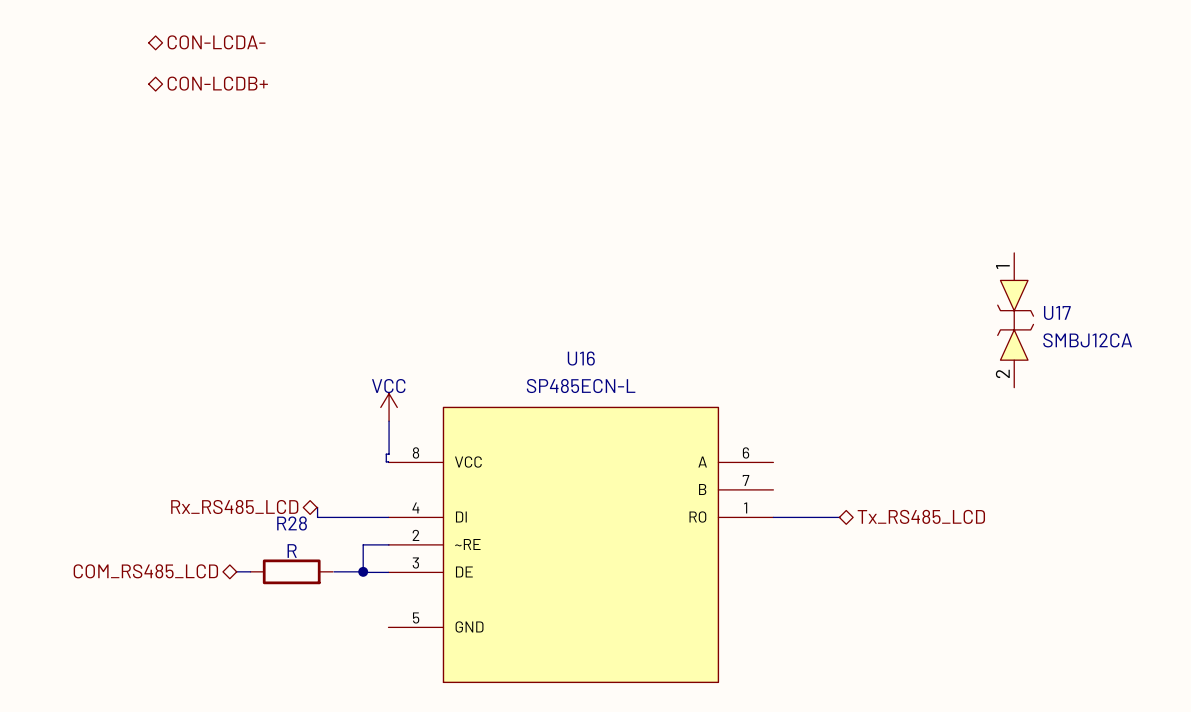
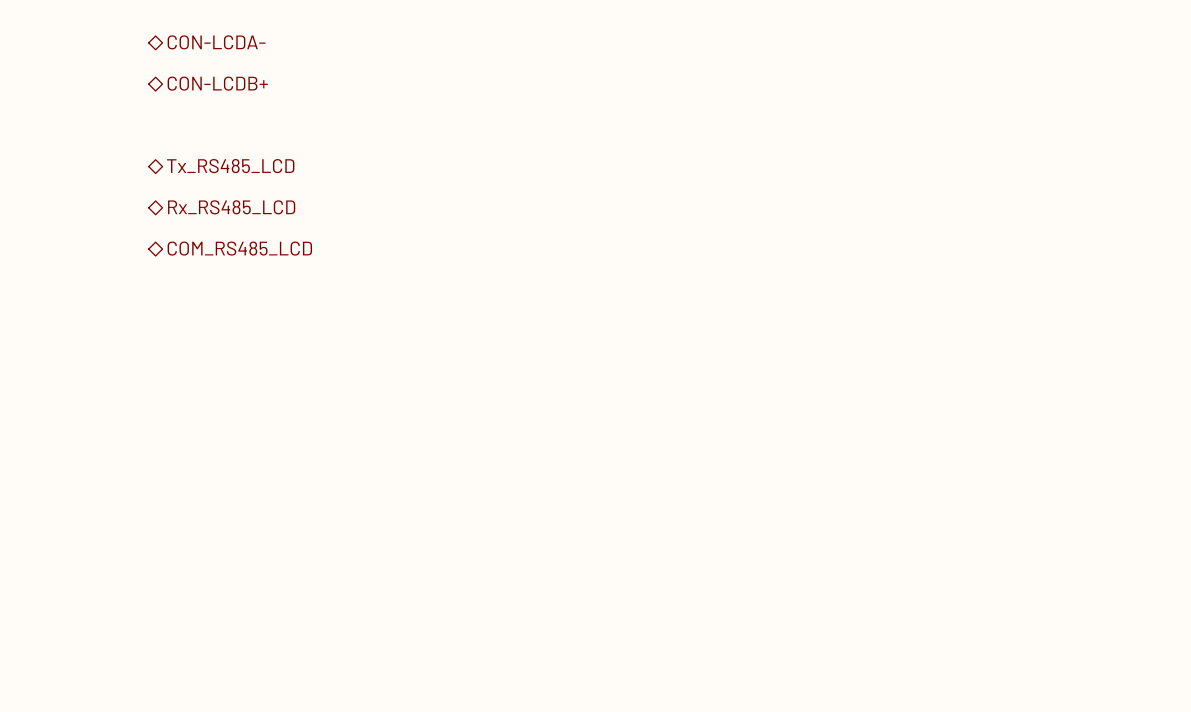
hierarchical label: none -> Tx_RS485_LCD (230, 166)
hierarchical label: none -> Rx_RS485_LCD (231, 207)
hierarchical label: none -> COM_RS485_LCD (239, 248)
U17: SMBJ12CA (1015, 320) -> none
power symbol: VCC (389, 407) -> none
wire: (389, 421) (389, 454) (386, 454) (386, 461) (388, 462) -> none
hierarchical label: Rx_RS485_LCD (234, 506) -> none
wire: (317, 507) (317, 517) (388, 517) -> none
hierarchical label: Tx_RS485_LCD (921, 516) -> none
wire: (773, 517) (839, 517) -> none
wire: (389, 544) (363, 544) (363, 572) (388, 572) -> none
U16: SP485ECN-L (580, 544) -> none
hierarchical label: COM_RS485_LCD (145, 571) -> none
wire: (236, 571) (250, 571) -> none
R28: R (291, 571) -> none
wire: (334, 571) (363, 571) -> none
junction: (363, 571) -> none

